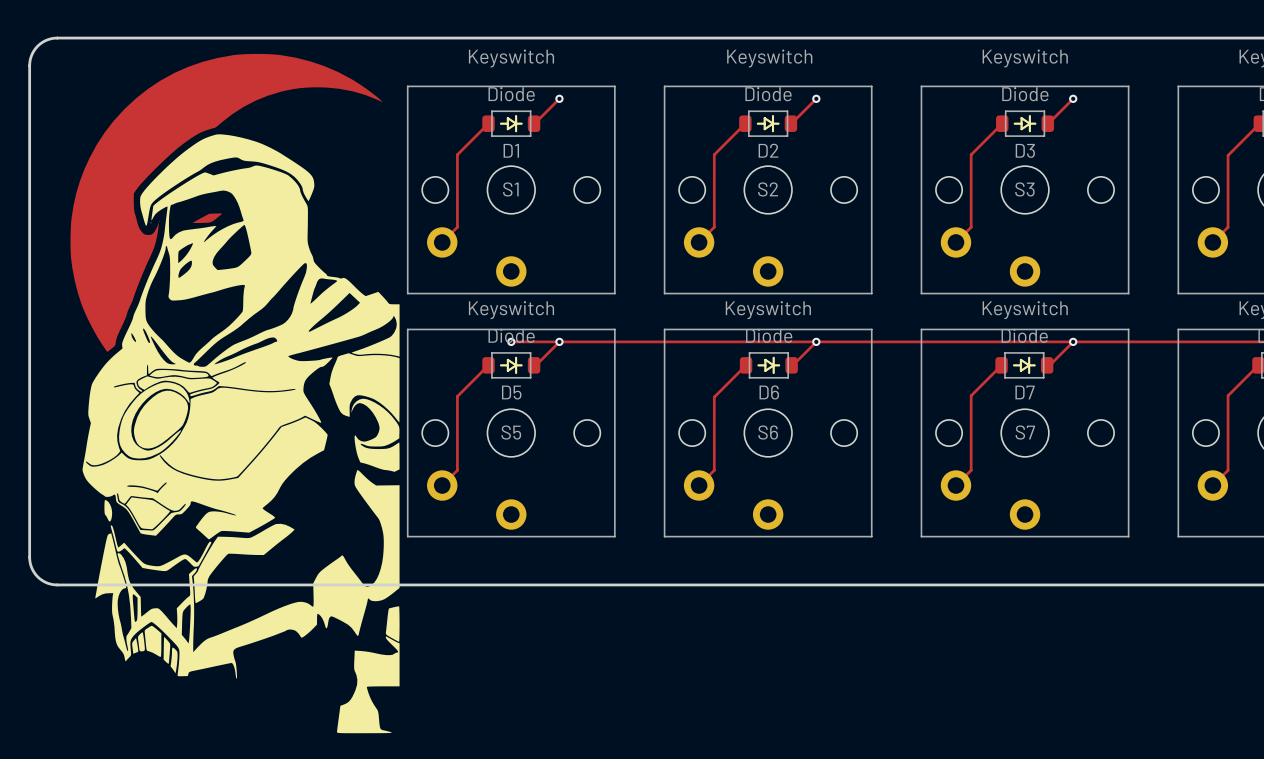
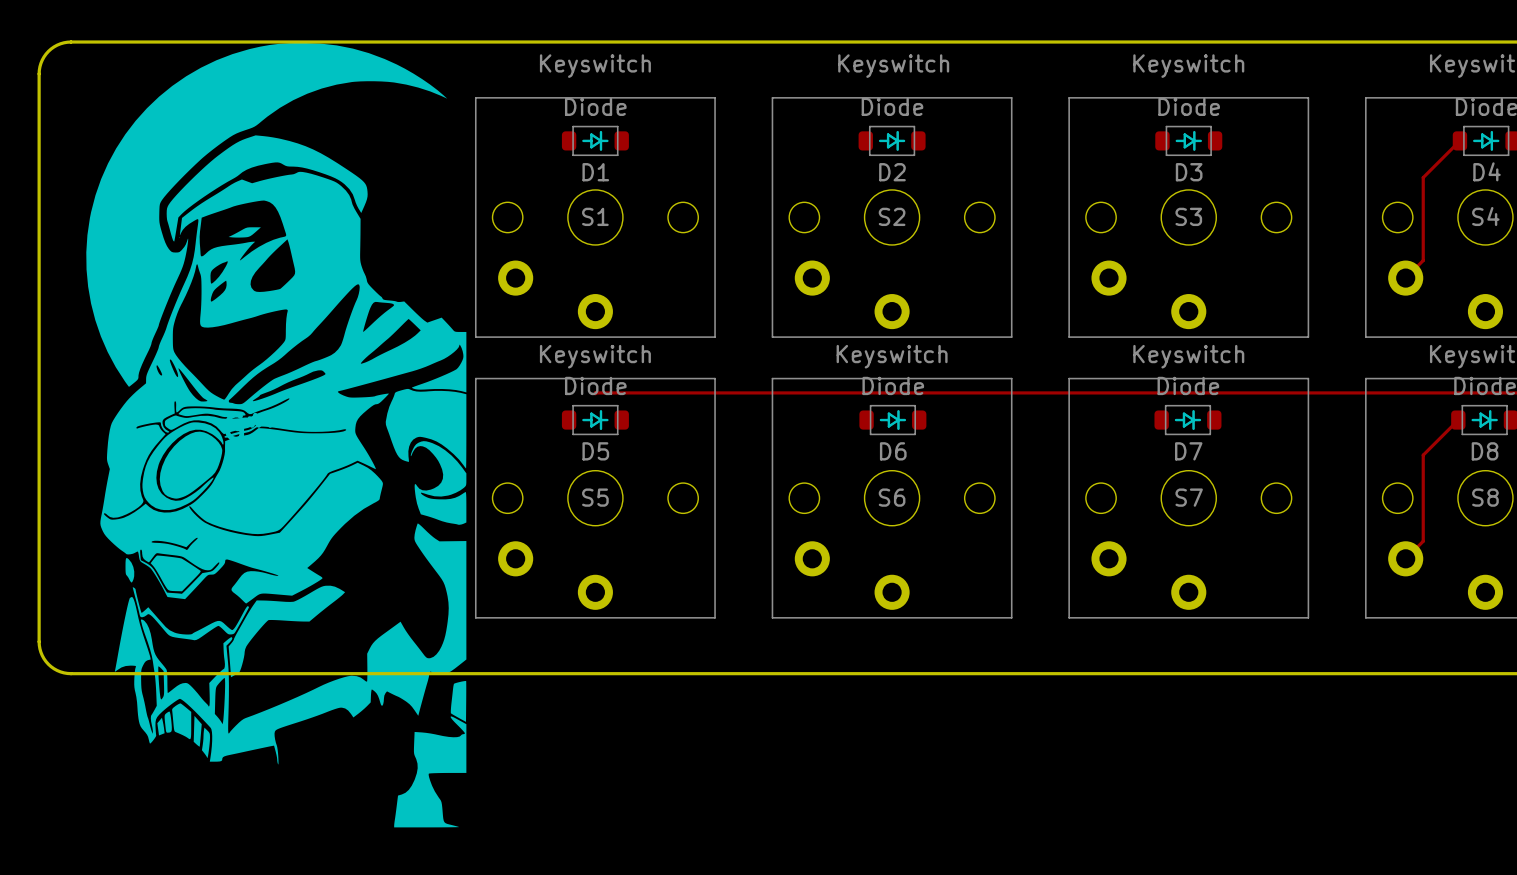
drawing: [70, 53, 400, 734] -> none
track: (559, 98) (534, 123) -> none
via: (559, 98) -> none
track: (816, 98) (790, 123) -> none
via: (816, 98) -> none
track: (1073, 98) (1047, 123) -> none
via: (1073, 98) -> none
track: (488, 123) (457, 154) (457, 227) (442, 242) -> none
track: (745, 123) (714, 154) (714, 227) (699, 242) -> none
track: (1002, 123) (971, 154) (971, 227) (955, 242) -> none
via: (511, 341) -> none
track: (559, 341) (534, 365) -> none
via: (559, 341) -> none
track: (816, 341) (791, 365) -> none
via: (816, 341) -> none
track: (1073, 341) (1049, 365) (1047, 365) -> none
via: (1073, 341) -> none
track: (488, 365) (457, 396) (457, 470) (442, 485) -> none
track: (746, 365) (714, 397) (714, 470) (699, 485) -> none
track: (1001, 365) (971, 395) (971, 470) (955, 485) -> none
part: none -> (276, 435)

